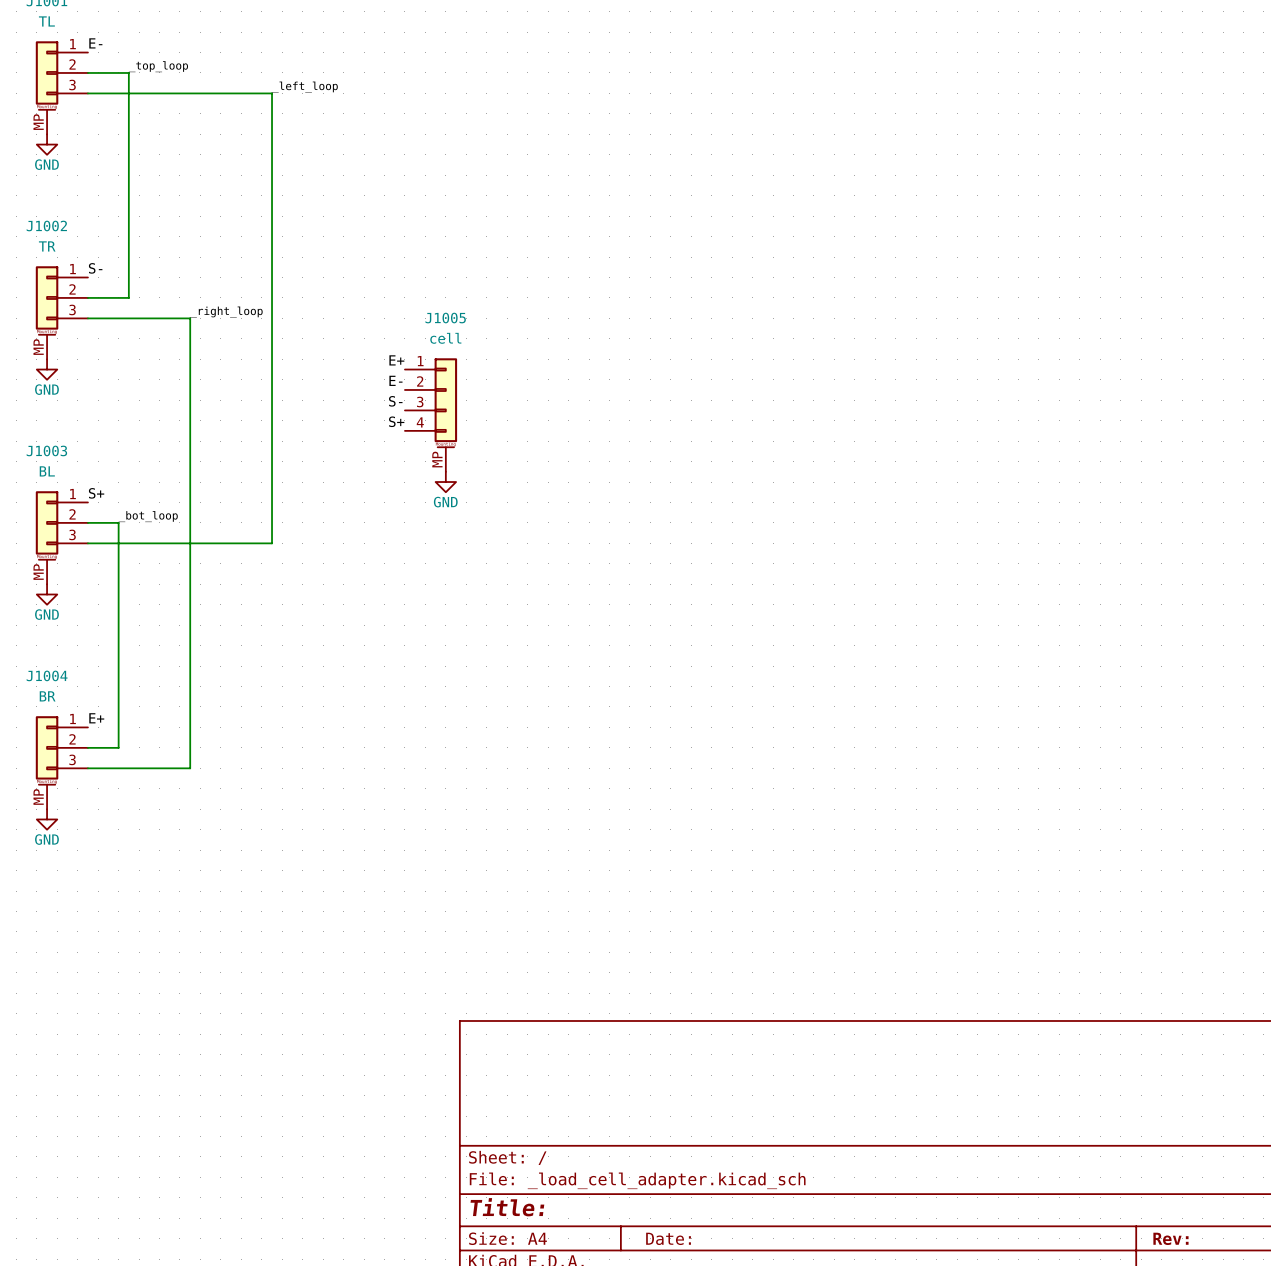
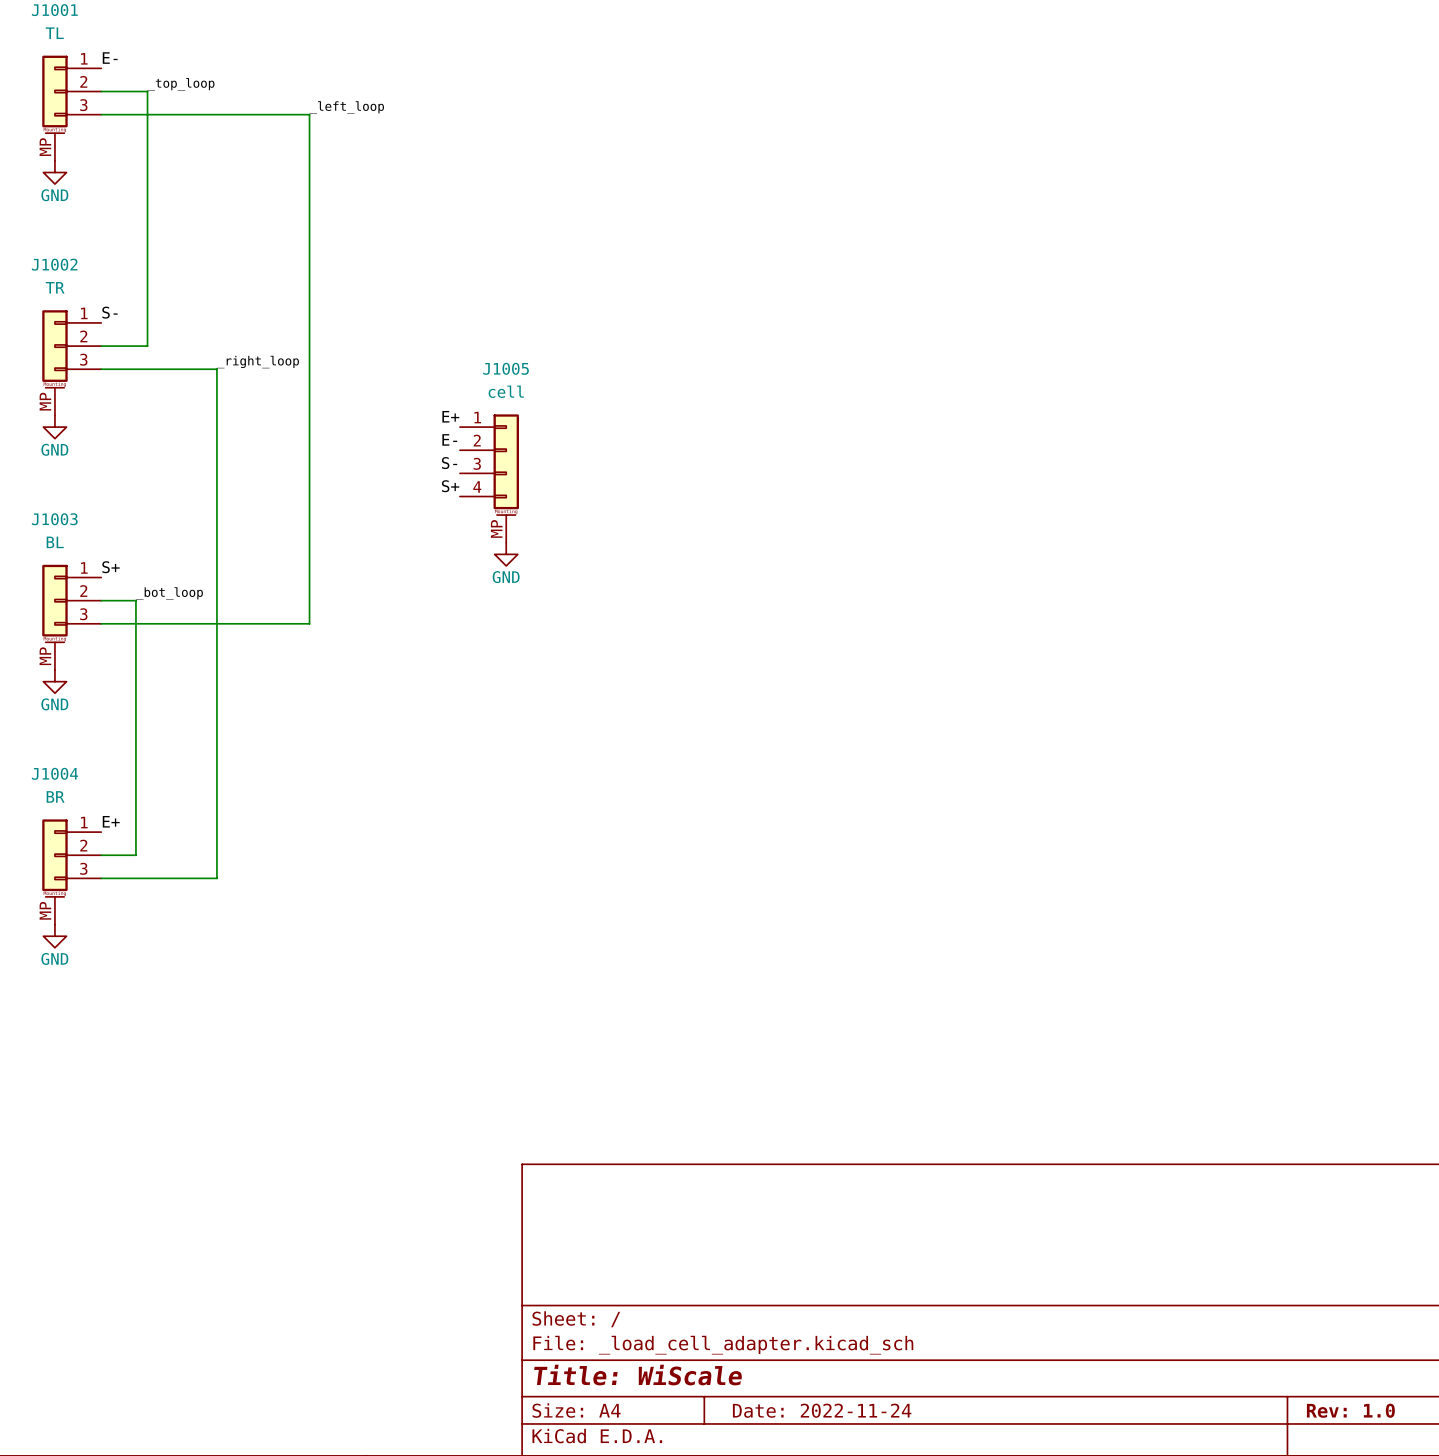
title block: Title: (507, 1207) -> Title: WiScale (638, 1375)
title block: Date: (668, 1238) -> Date: 2022-11-24 (822, 1410)
title block: Rev: (1170, 1238) -> Rev: 1.0 (1350, 1410)

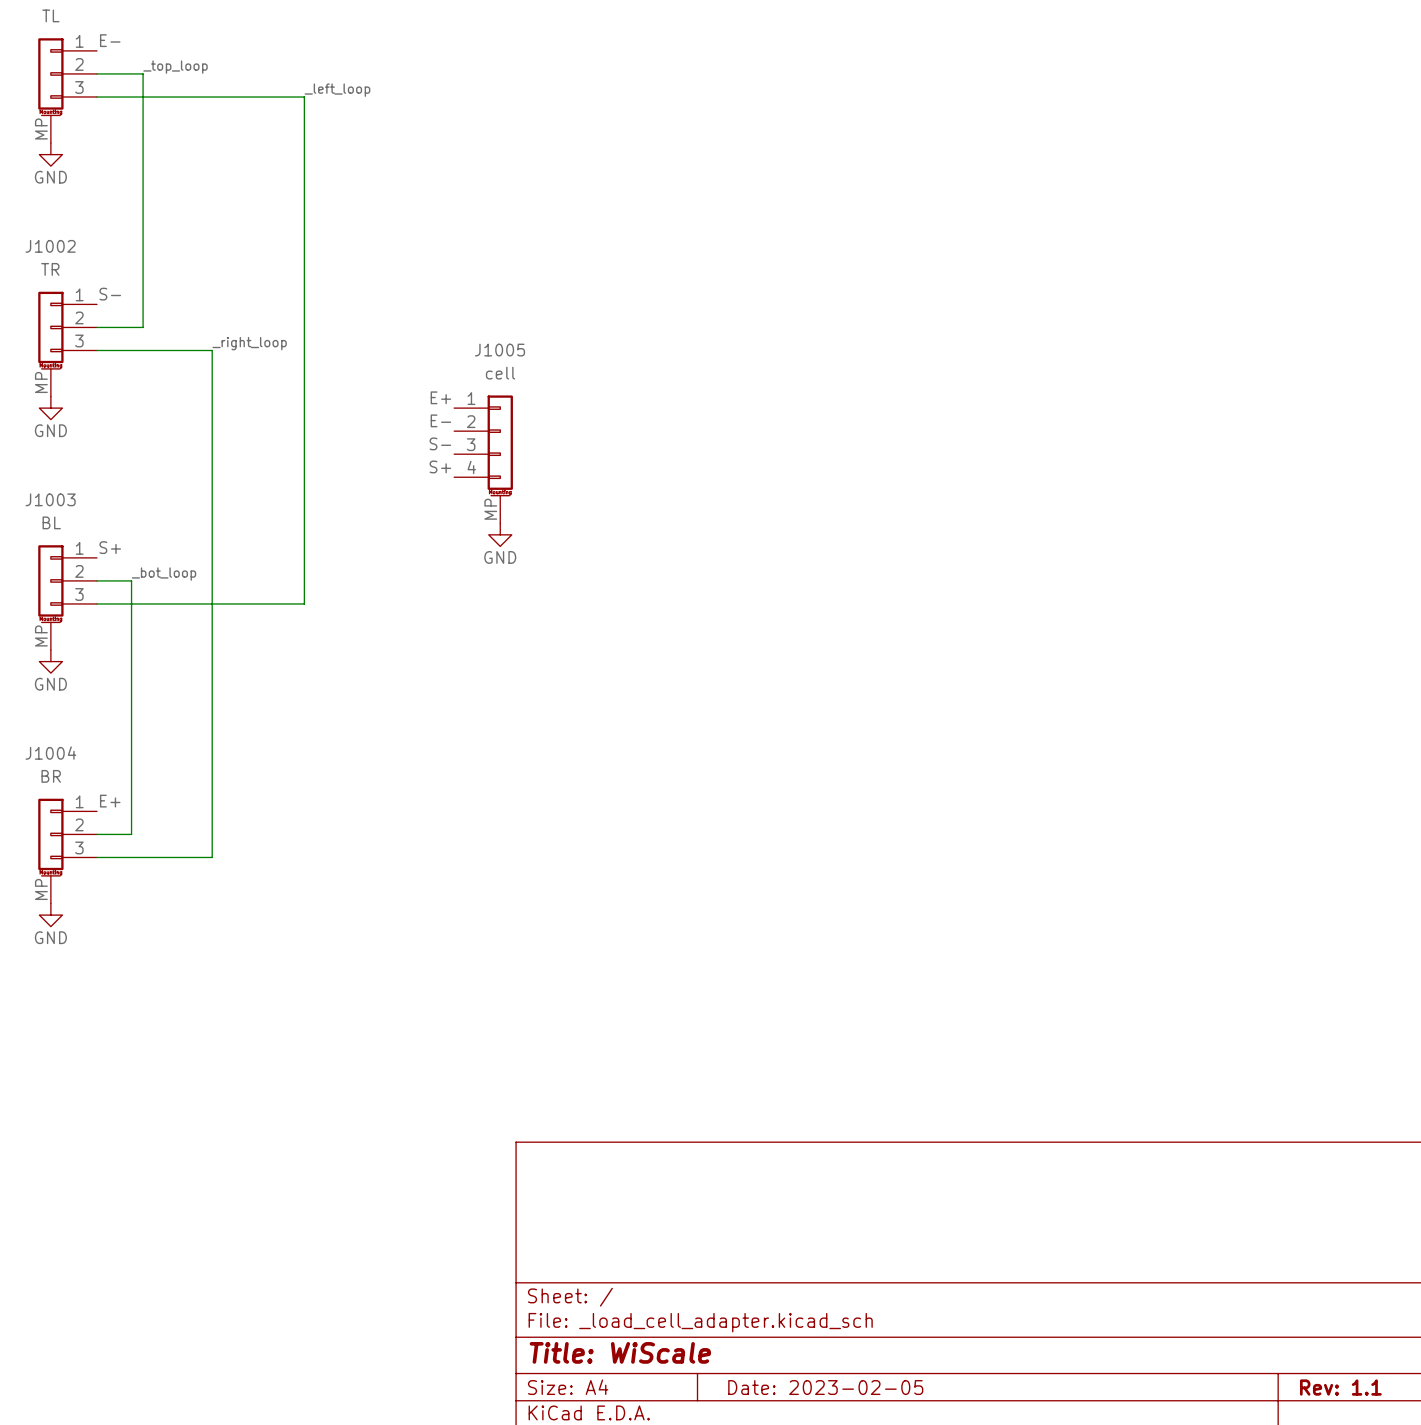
title block: Date: 2022-11-24 (822, 1410) -> Date: 2023-02-05 (825, 1387)
title block: Rev: 1.0 (1350, 1410) -> Rev: 1.1 (1340, 1387)

